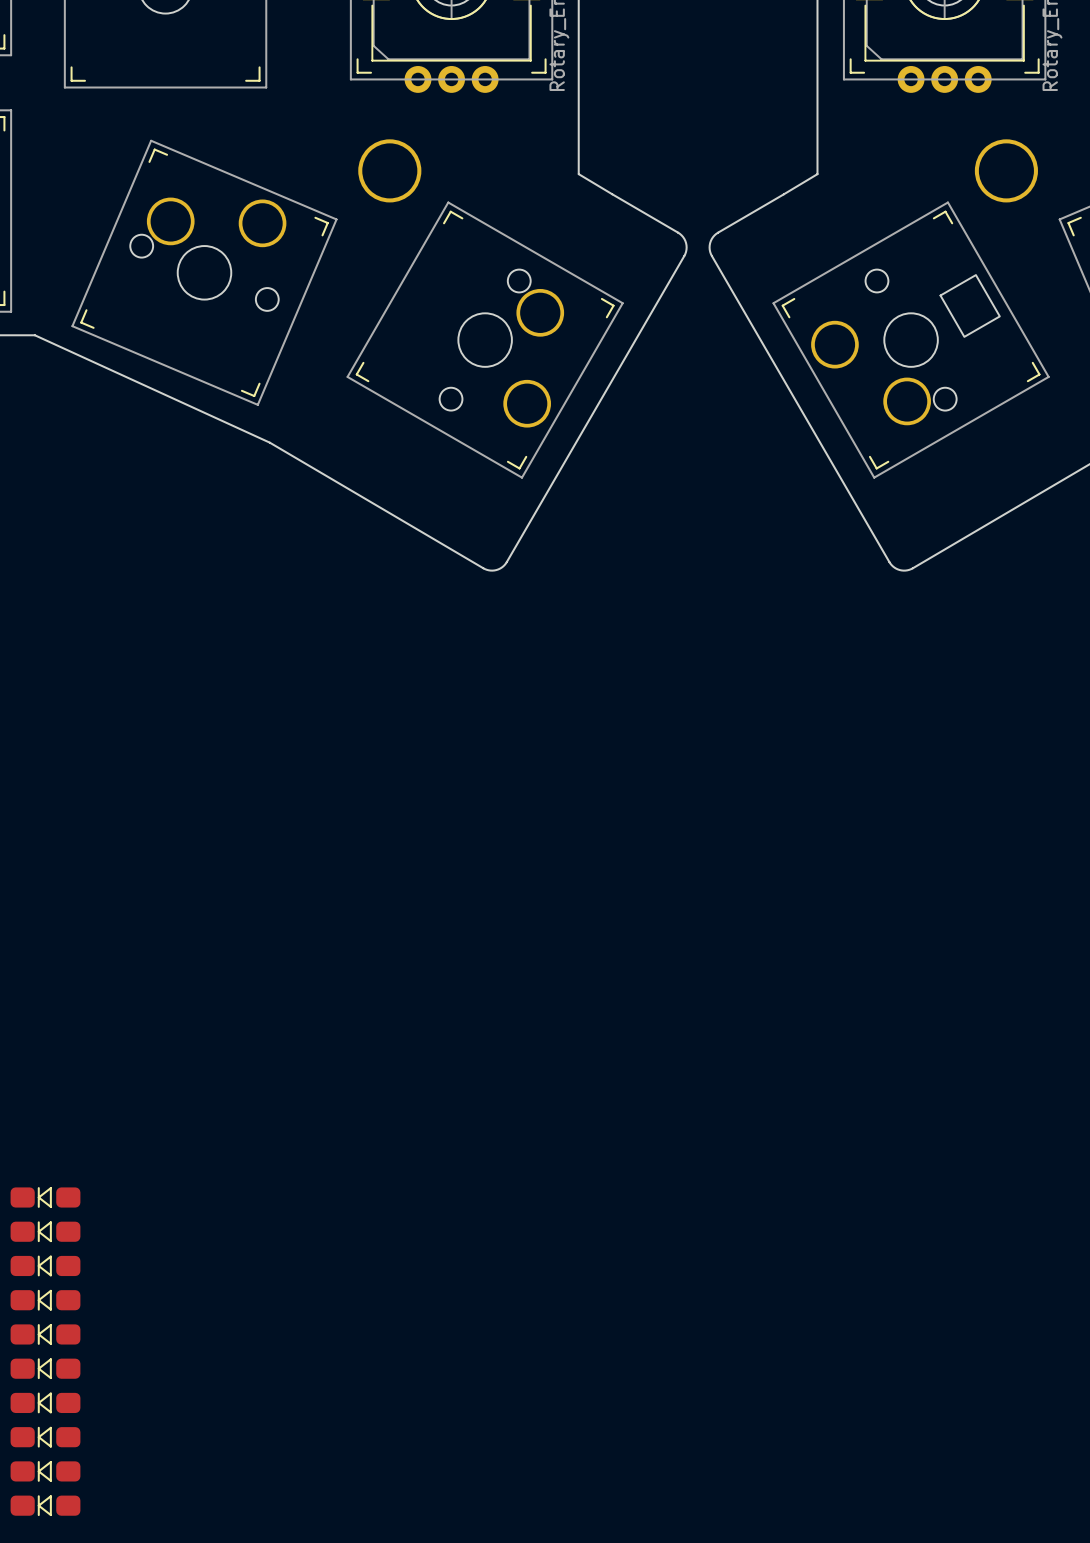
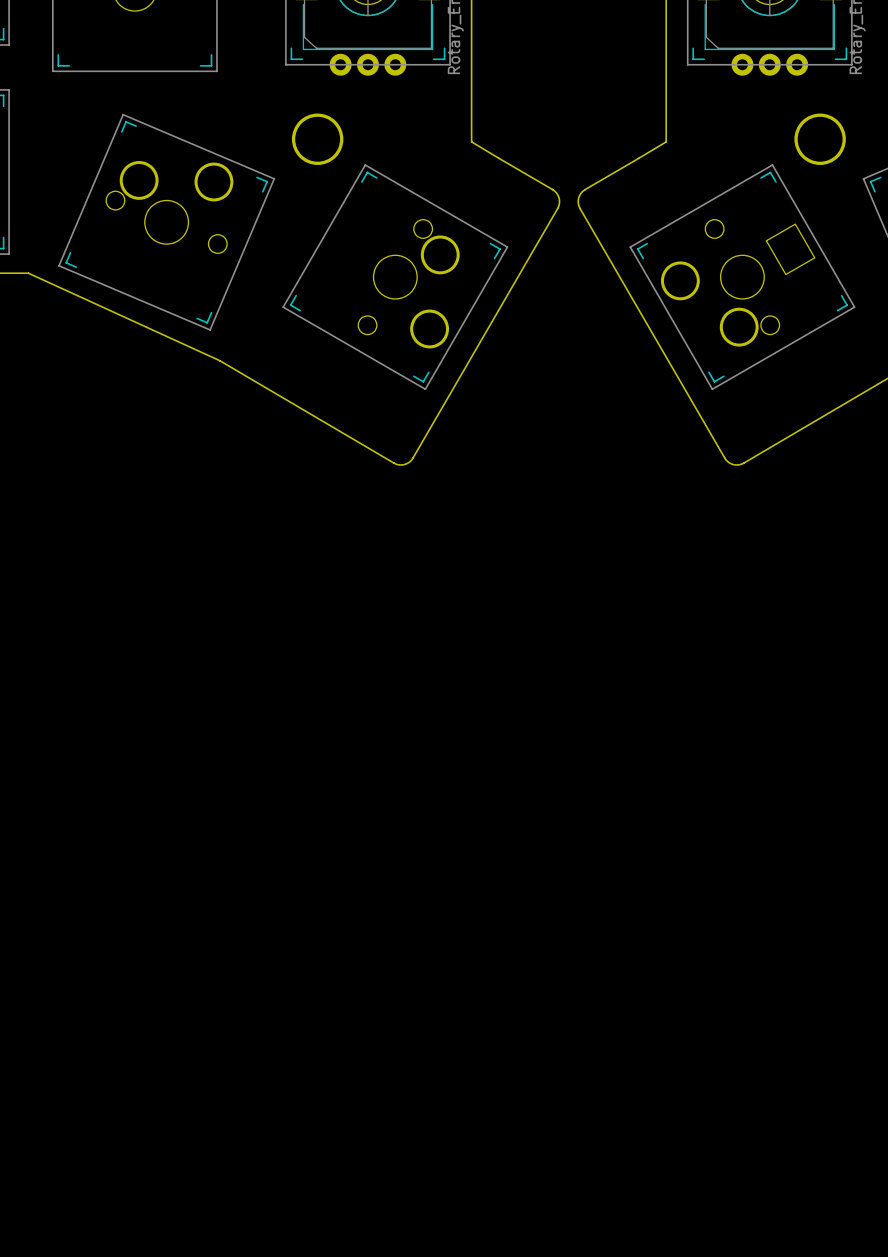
part: (45, 1197) -> none
part: (45, 1231) -> none
part: (45, 1265) -> none
part: (45, 1300) -> none
part: (45, 1334) -> none
part: (45, 1368) -> none
part: (45, 1402) -> none
part: (45, 1437) -> none
part: (45, 1471) -> none
part: (45, 1505) -> none

